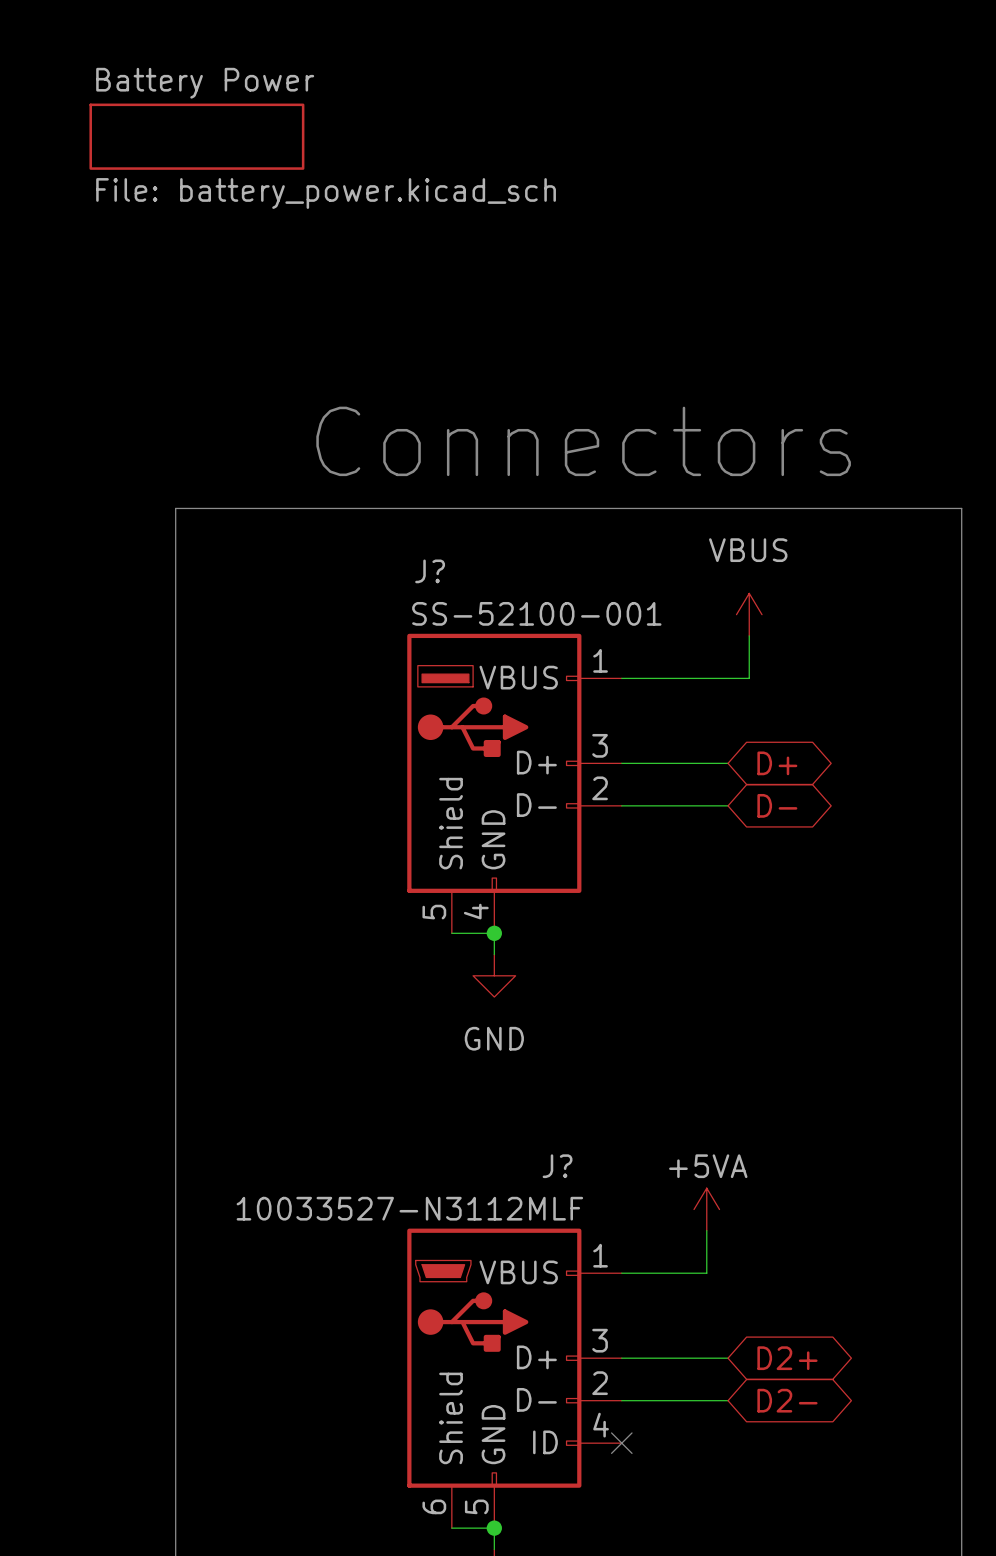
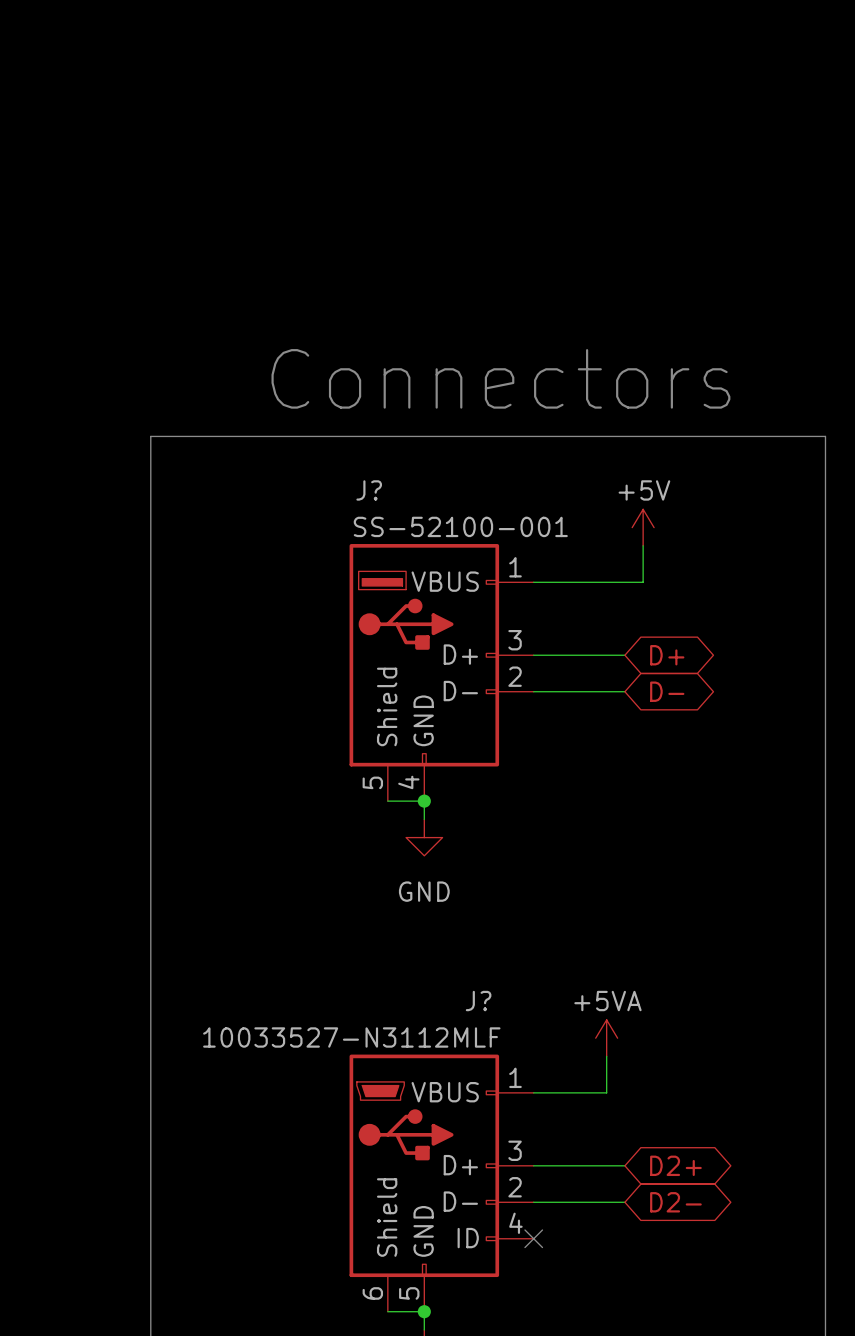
sheet Battery Power: File: battery_power.kicad_sch (196, 136) -> none
power symbol: VBUS (749, 614) -> +5V (643, 527)

